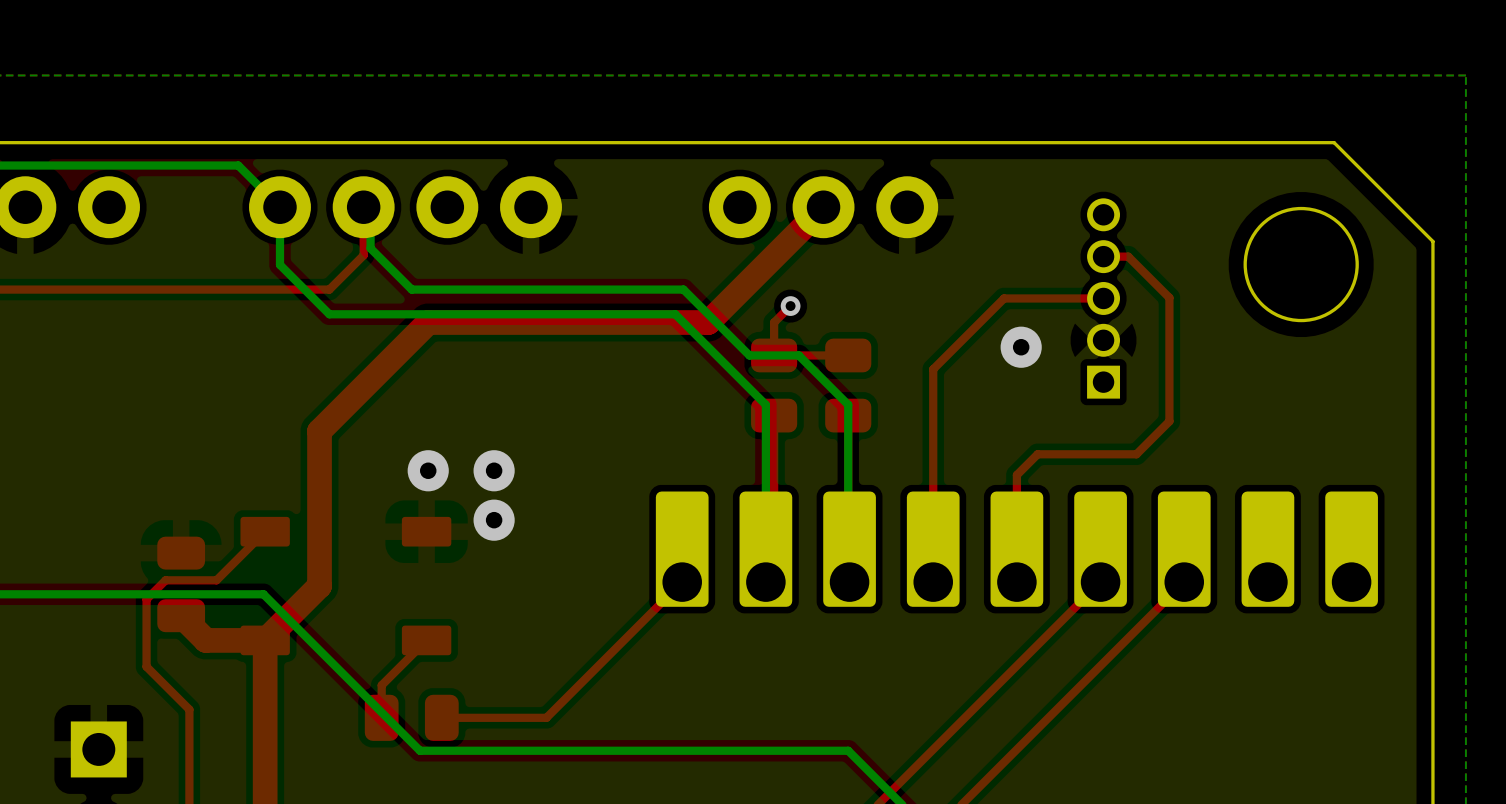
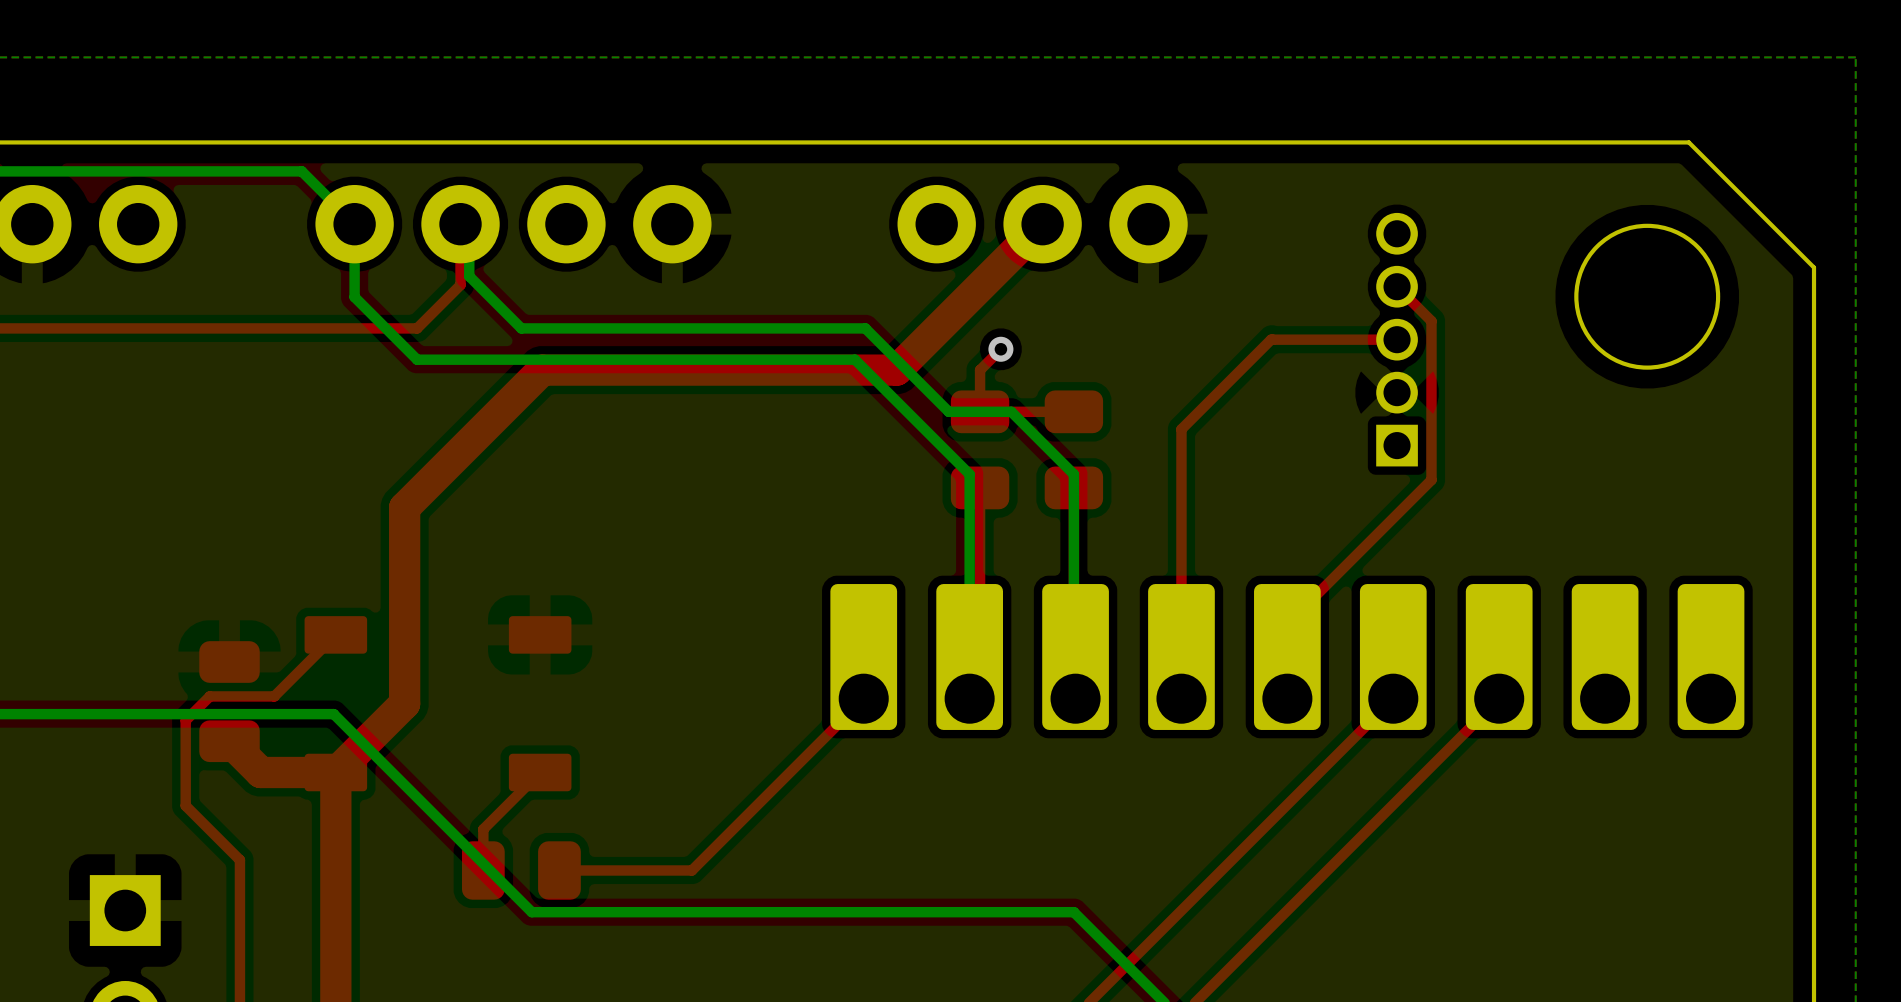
top track: (1103, 256) (1128, 256) (1169, 297) (1169, 421) (1136, 454) (1037, 454) (1016, 475) (1016, 523) -> (1397, 286) (1431, 321) (1431, 480) (1287, 624)
via: (1021, 347) -> none
via: (428, 470) -> none
via: (494, 470) -> none
via: (494, 520) -> none

